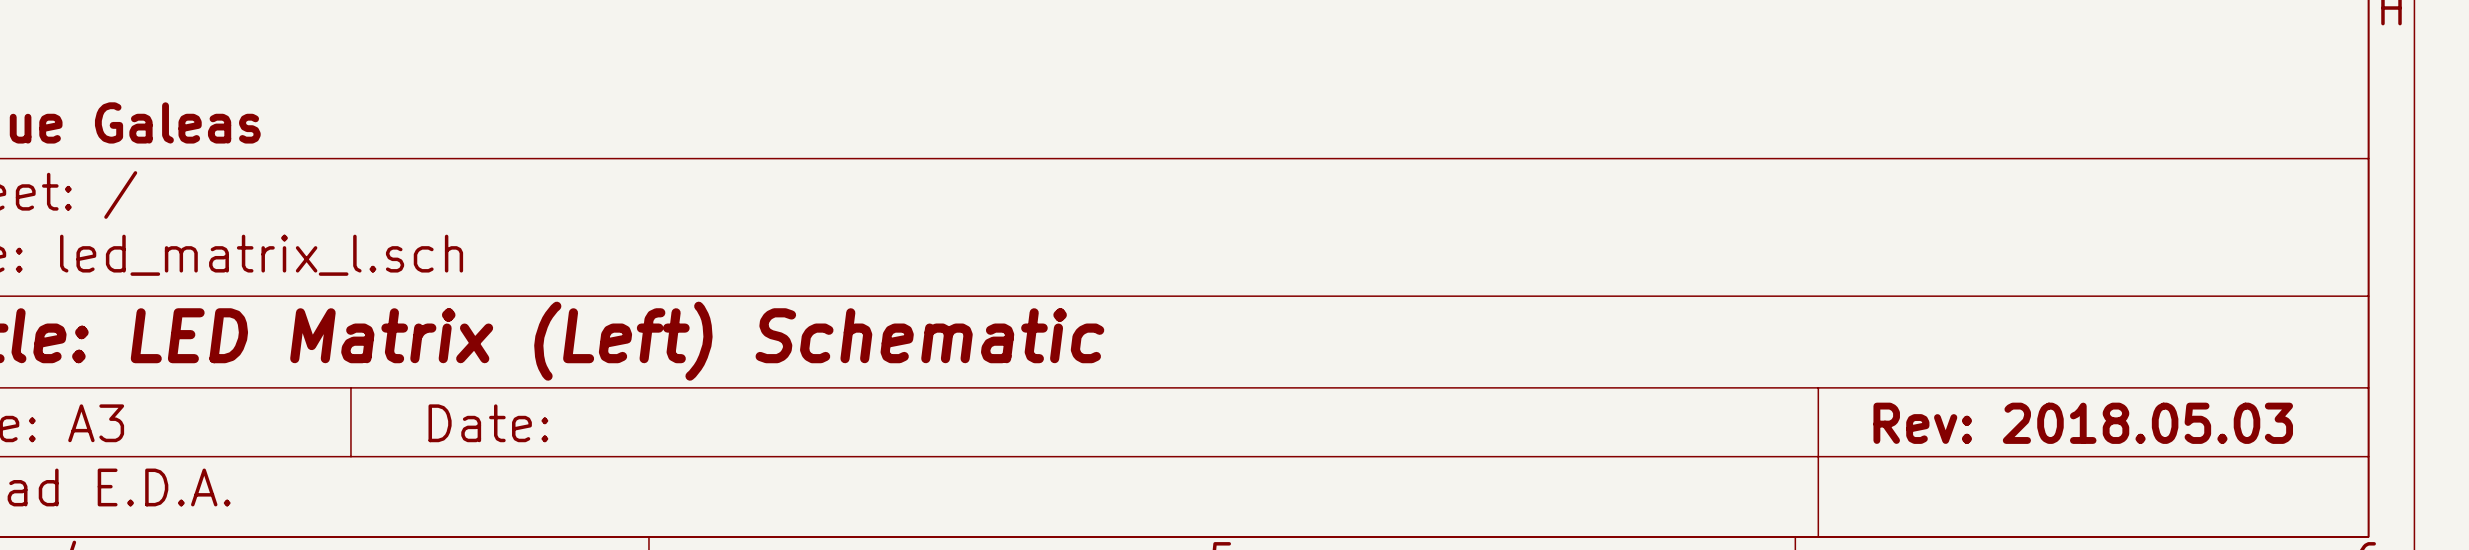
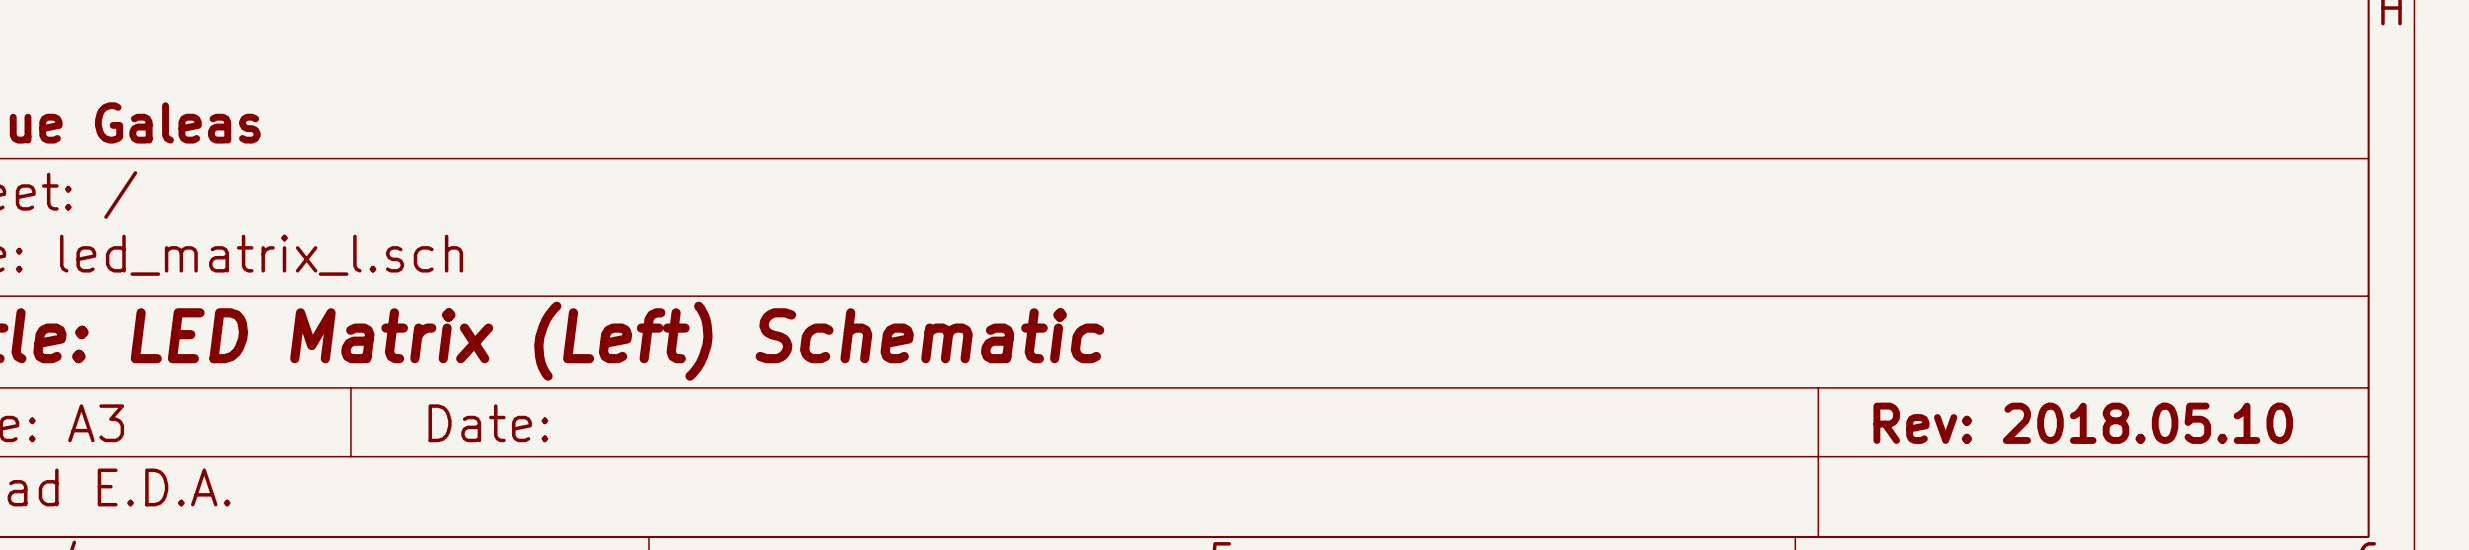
title block: Rev: 2018.05.03 (2083, 423) -> Rev: 2018.05.10 (2083, 423)

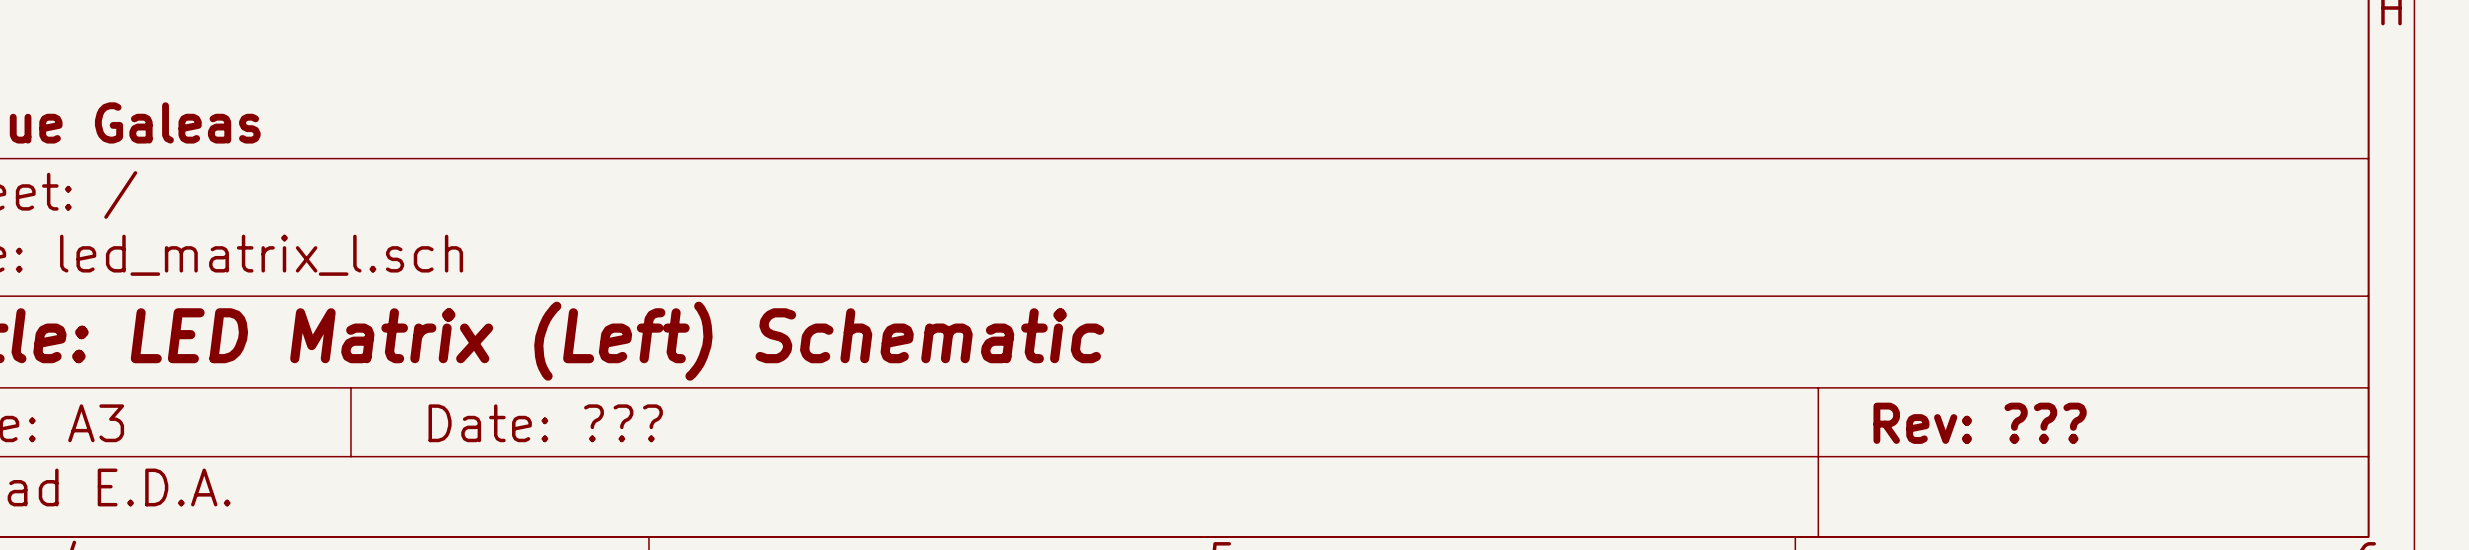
title block: Date: (488, 423) -> Date: ??? (545, 423)
title block: Rev: 2018.05.10 (2083, 423) -> Rev: ??? (1980, 423)

